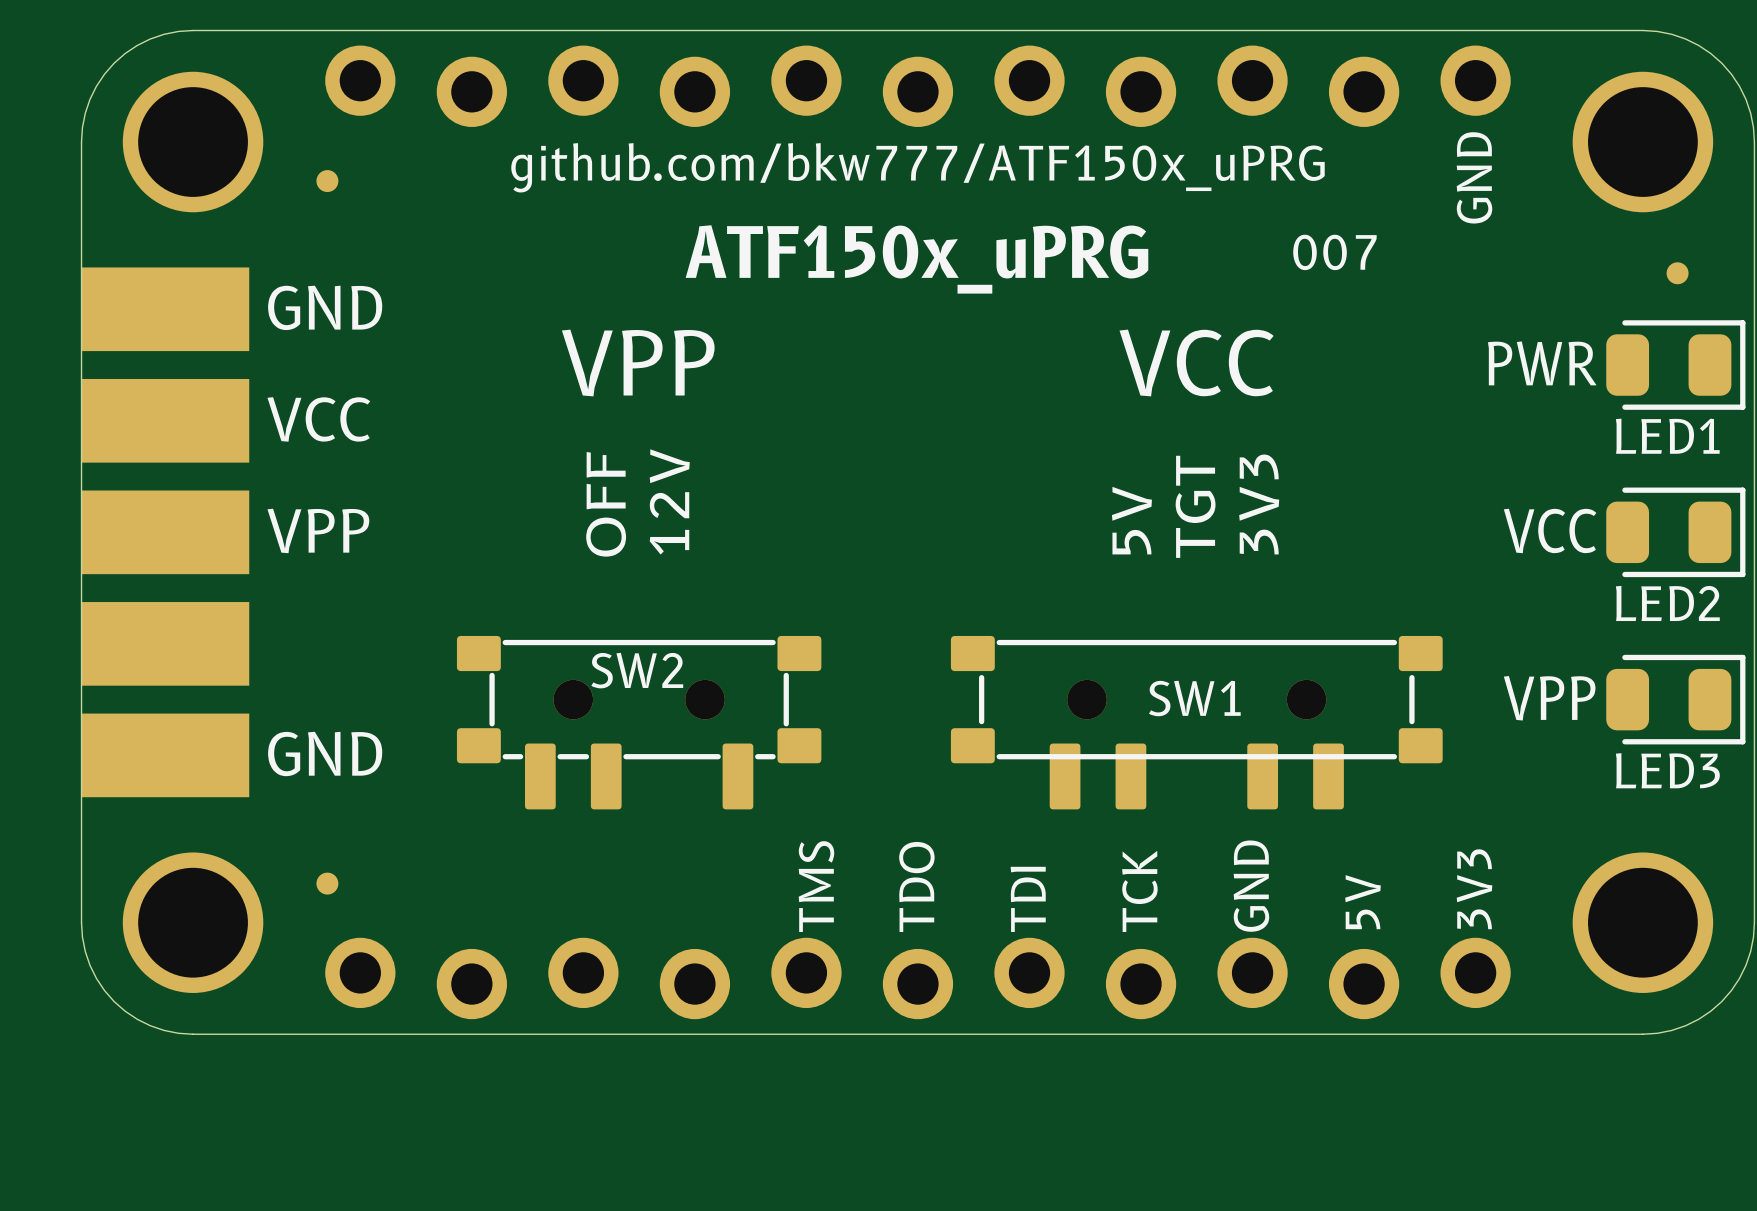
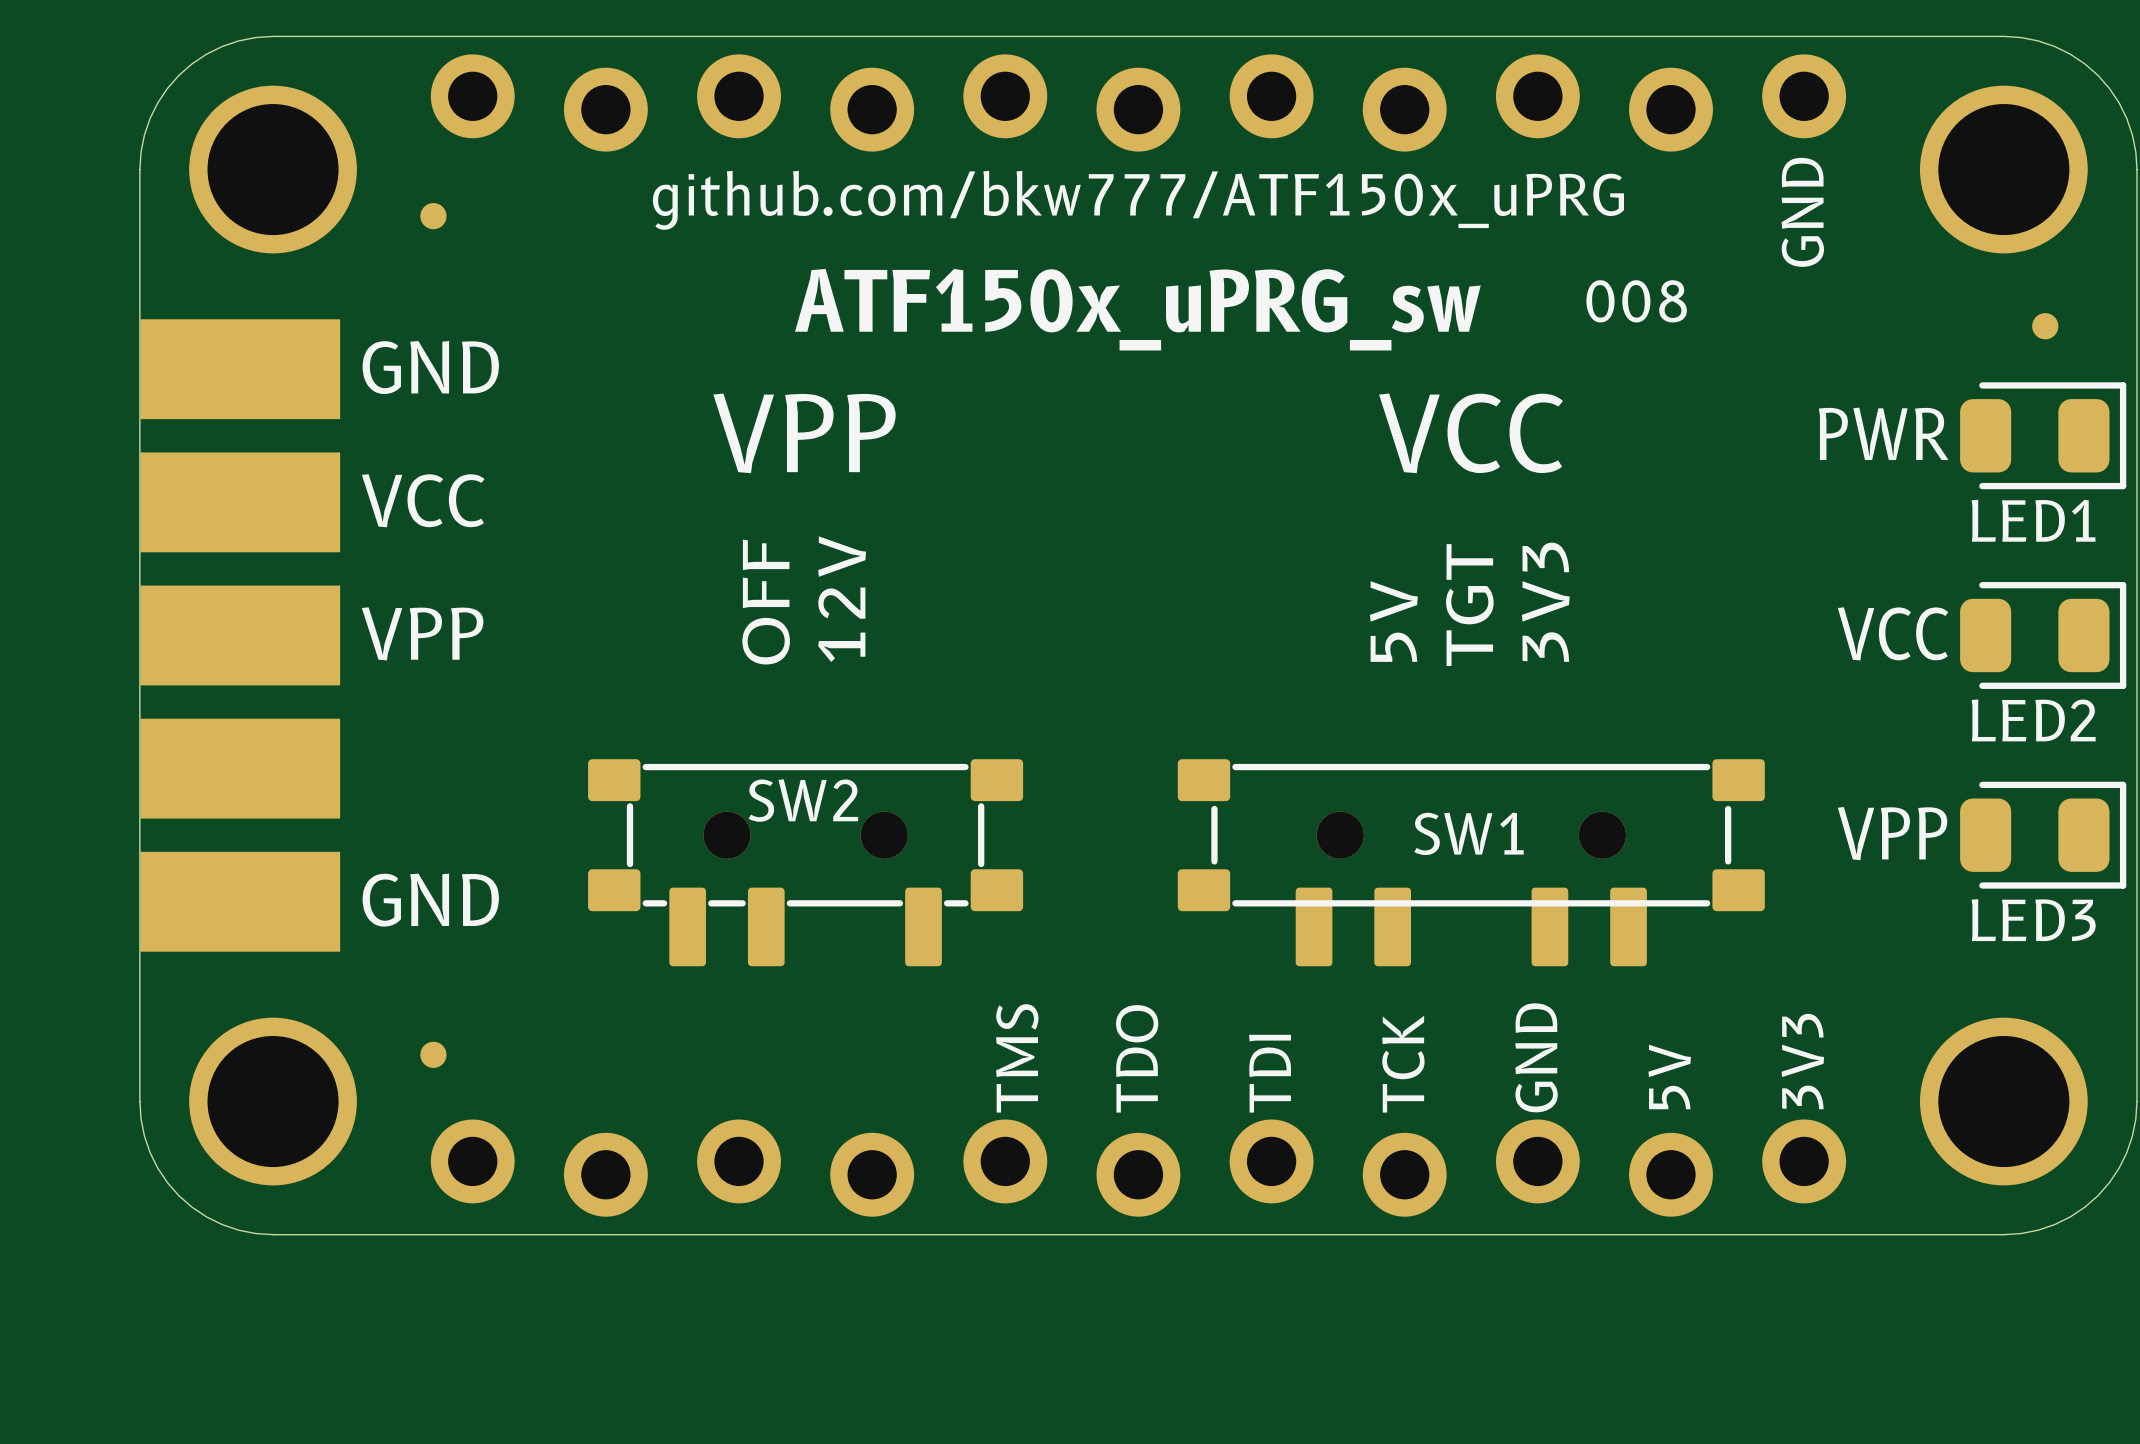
text: 007 (1334, 252) -> 008 (1636, 301)
text: ATF150x_uPRG (916, 259) -> ATF150x_uPRG_sw (1137, 309)

